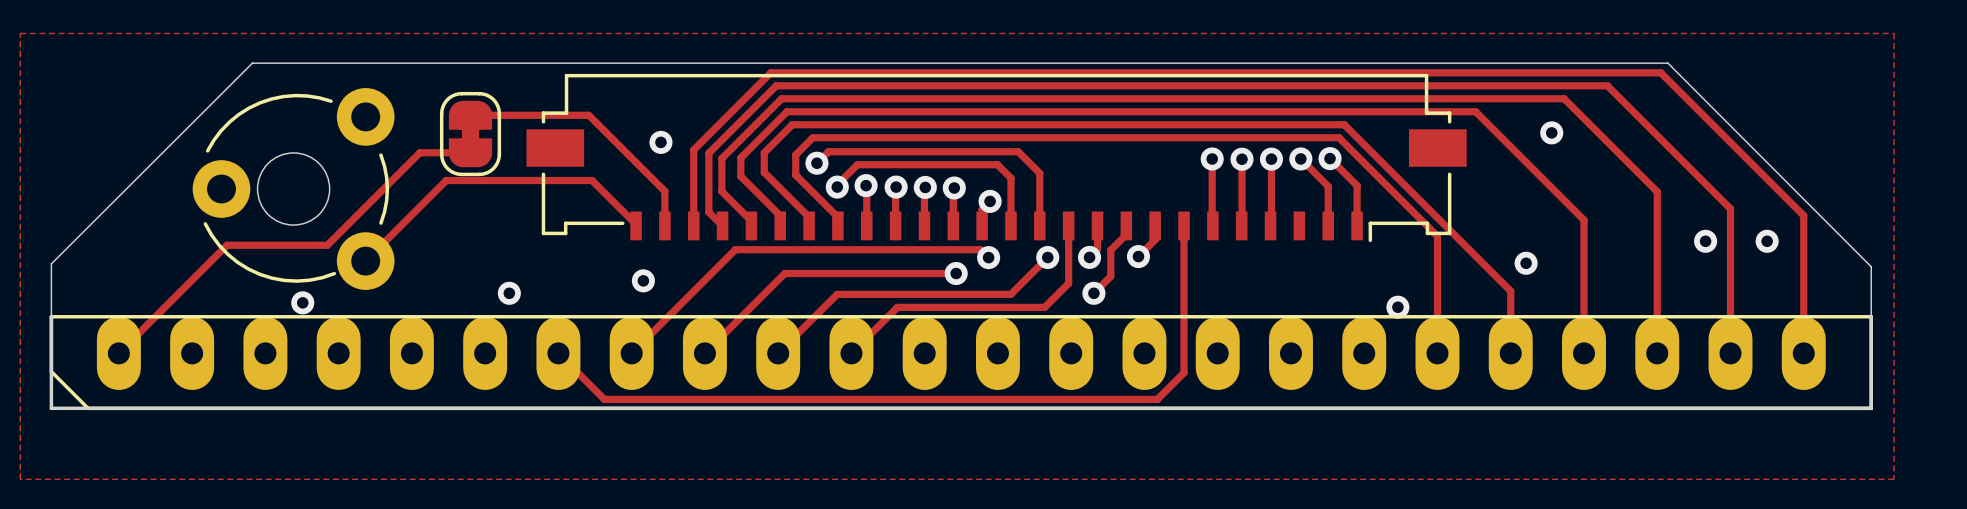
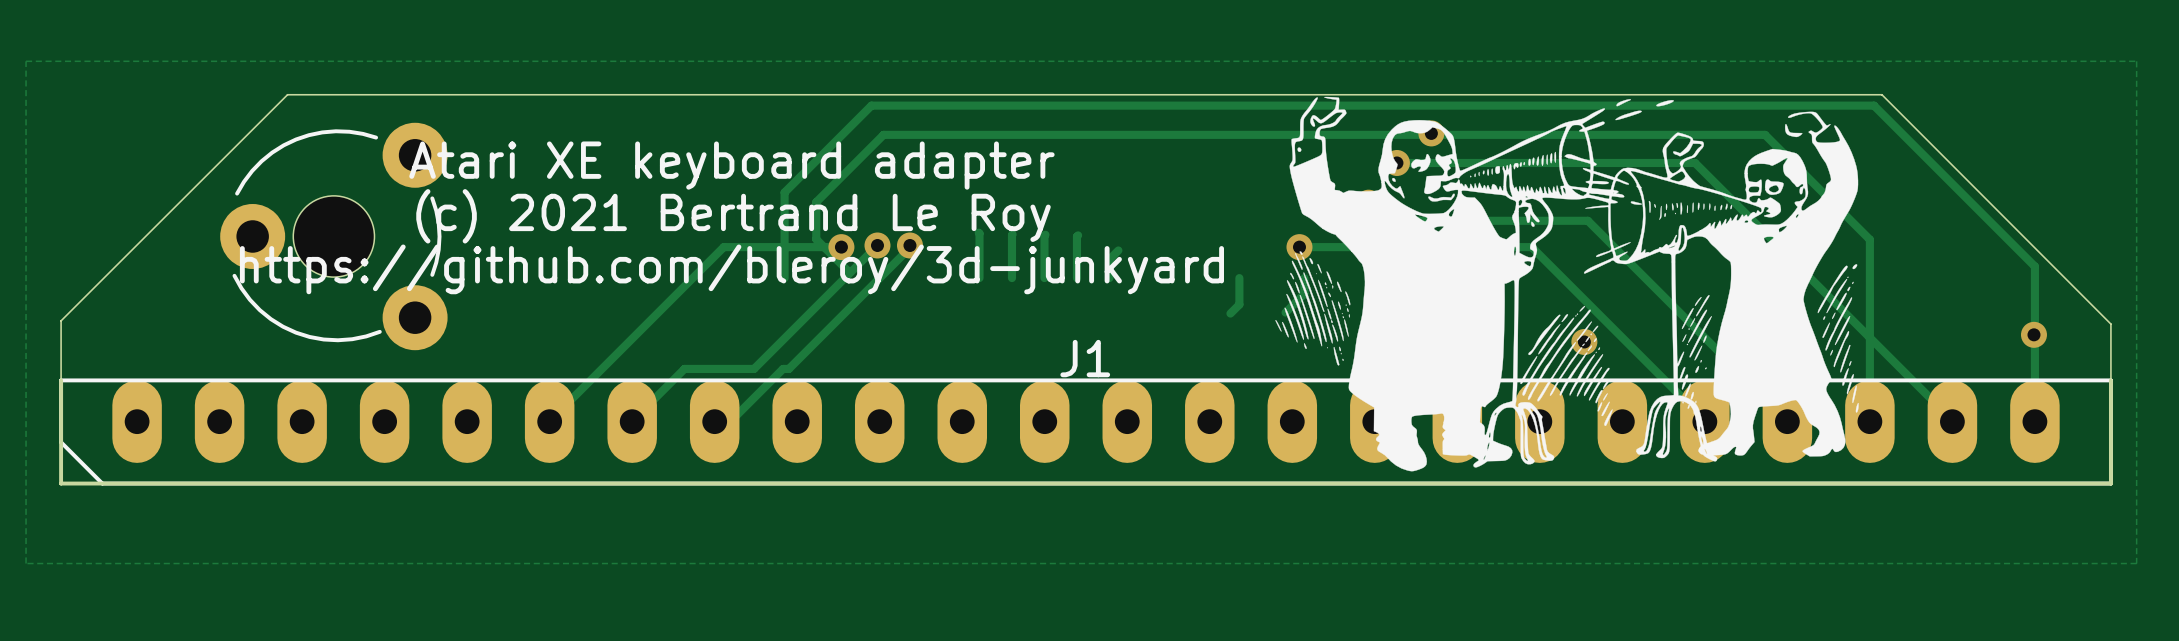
drawing: none -> [1275, 96, 1859, 472]
via: none -> (1431, 133)
track: (470, 115) (588, 115) (664, 191) (664, 225) -> none
via: none -> (1396, 162)
text: none -> Atari XE keyboard adapter (731, 165)
via: (1551, 132) -> none
part: (470, 134) -> none
via: (660, 142) -> none
track: (470, 152) (419, 152) (327, 245) (227, 245) (118, 353) -> none
part: (996, 158) -> none
track: (1212, 158) (1212, 225) -> none
track: (1300, 158) (1328, 186) (1328, 225) -> none
via: (1300, 158) -> none
track: (1330, 158) (1357, 185) (1357, 225) -> none
via: (1330, 158) -> none
track: (1242, 159) (1242, 225) -> none
via: (1242, 159) -> none
track: (1271, 159) (1271, 224) -> none
via: (1271, 159) -> none
track: (816, 163) (828, 151) (1018, 151) (1039, 173) (1039, 225) -> none
via: (816, 163) -> none
text: none -> (c) 2021 Bertrand Le Roy (733, 216)
via: (866, 185) -> none
track: (837, 187) (837, 184) (857, 164) (997, 164) (1010, 178) (1010, 225) -> none
via: (837, 187) -> none
via: (896, 187) -> none
via: (925, 187) -> none
via: (954, 188) -> none
via: none -> (877, 245)
via: none -> (909, 245)
track: none -> (841, 247) (723, 247) (550, 420)
via: none -> (841, 247)
via: none -> (1299, 247)
via: (990, 201) -> none
track: (780, 215) (740, 176) (740, 157) (786, 111) (1475, 111) (1583, 220) (1583, 353) -> (1332, 220) (1587, 220) (1787, 420)
track: (809, 217) (764, 172) (764, 152) (792, 124) (1344, 124) (1510, 291) (1510, 353) -> (1299, 247) (1531, 247) (1705, 420)
track: (837, 217) (795, 175) (795, 154) (812, 137) (1338, 137) (1437, 236) (1437, 353) -> none
text: none -> https://github.com/bleroy/3d-junkyard (731, 269)
track: (636, 224) (592, 180) (446, 180) (365, 261) -> none
track: (722, 225) (708, 212) (708, 153) (776, 85) (1607, 85) (1730, 208) (1730, 353) -> (1396, 162) (1695, 162) (1952, 420)
track: (1068, 225) (1068, 283) (1044, 307) (897, 307) (851, 353) -> none
track: (1184, 225) (1184, 372) (1157, 399) (604, 399) (558, 353) -> (877, 245) (754, 368) (684, 368) (632, 420)
track: (1126, 234) (1110, 250) (1110, 276) (1093, 293) -> none
via: (1705, 241) -> none
via position: (1767, 241) -> (2033, 334)
via: (1138, 256) -> none
track: (988, 257) (980, 249) (735, 249) (631, 353) -> (909, 245) (909, 247) (788, 368) (783, 368) (731, 420) (715, 420)
via: (988, 257) -> none
track: (1047, 257) (1010, 294) (837, 294) (778, 353) -> none
via: (1047, 257) -> none
via: (1089, 257) -> none
via: (1526, 263) -> none
track: (956, 273) (784, 273) (704, 353) -> none
via: (956, 273) -> none
via: (643, 280) -> none
via: (509, 293) -> none
via: (1093, 293) -> none
J1 name: none -> J1 (1085, 358)
via: (302, 302) -> none
via position: (1397, 307) -> (1584, 341)

